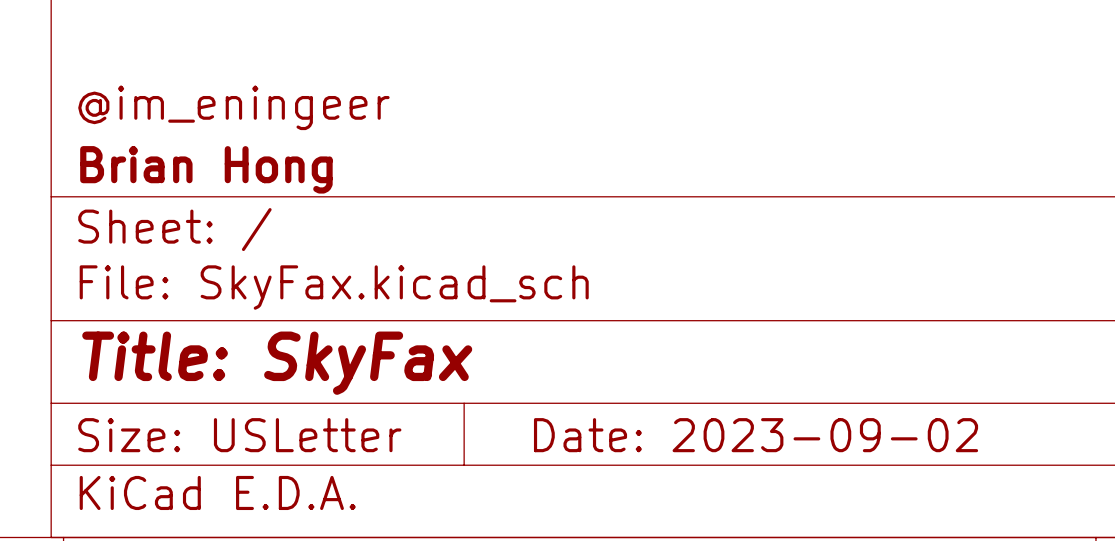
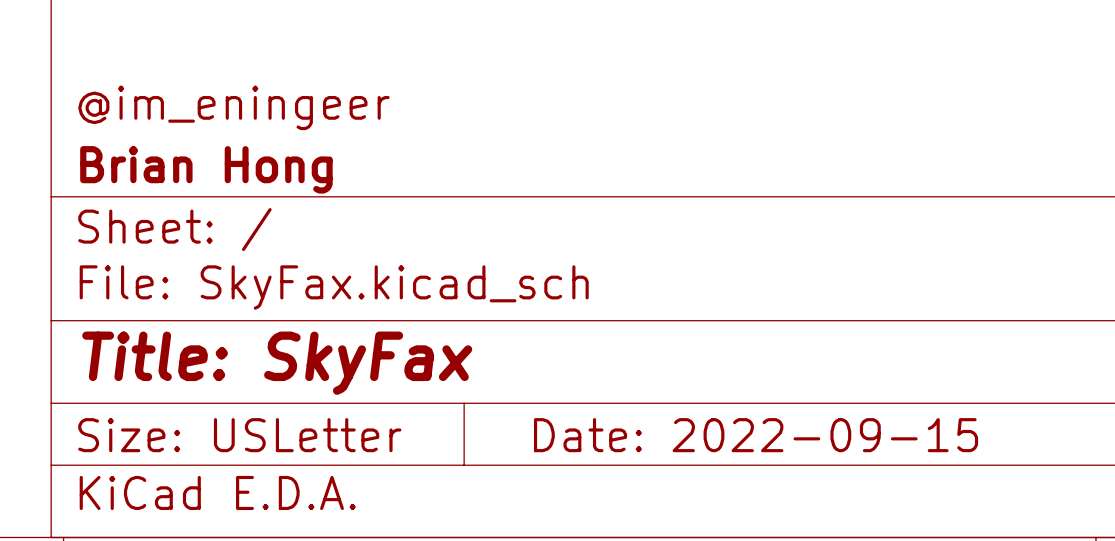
title block: Date: 2023-09-02 (756, 435) -> Date: 2022-09-15 (756, 435)

